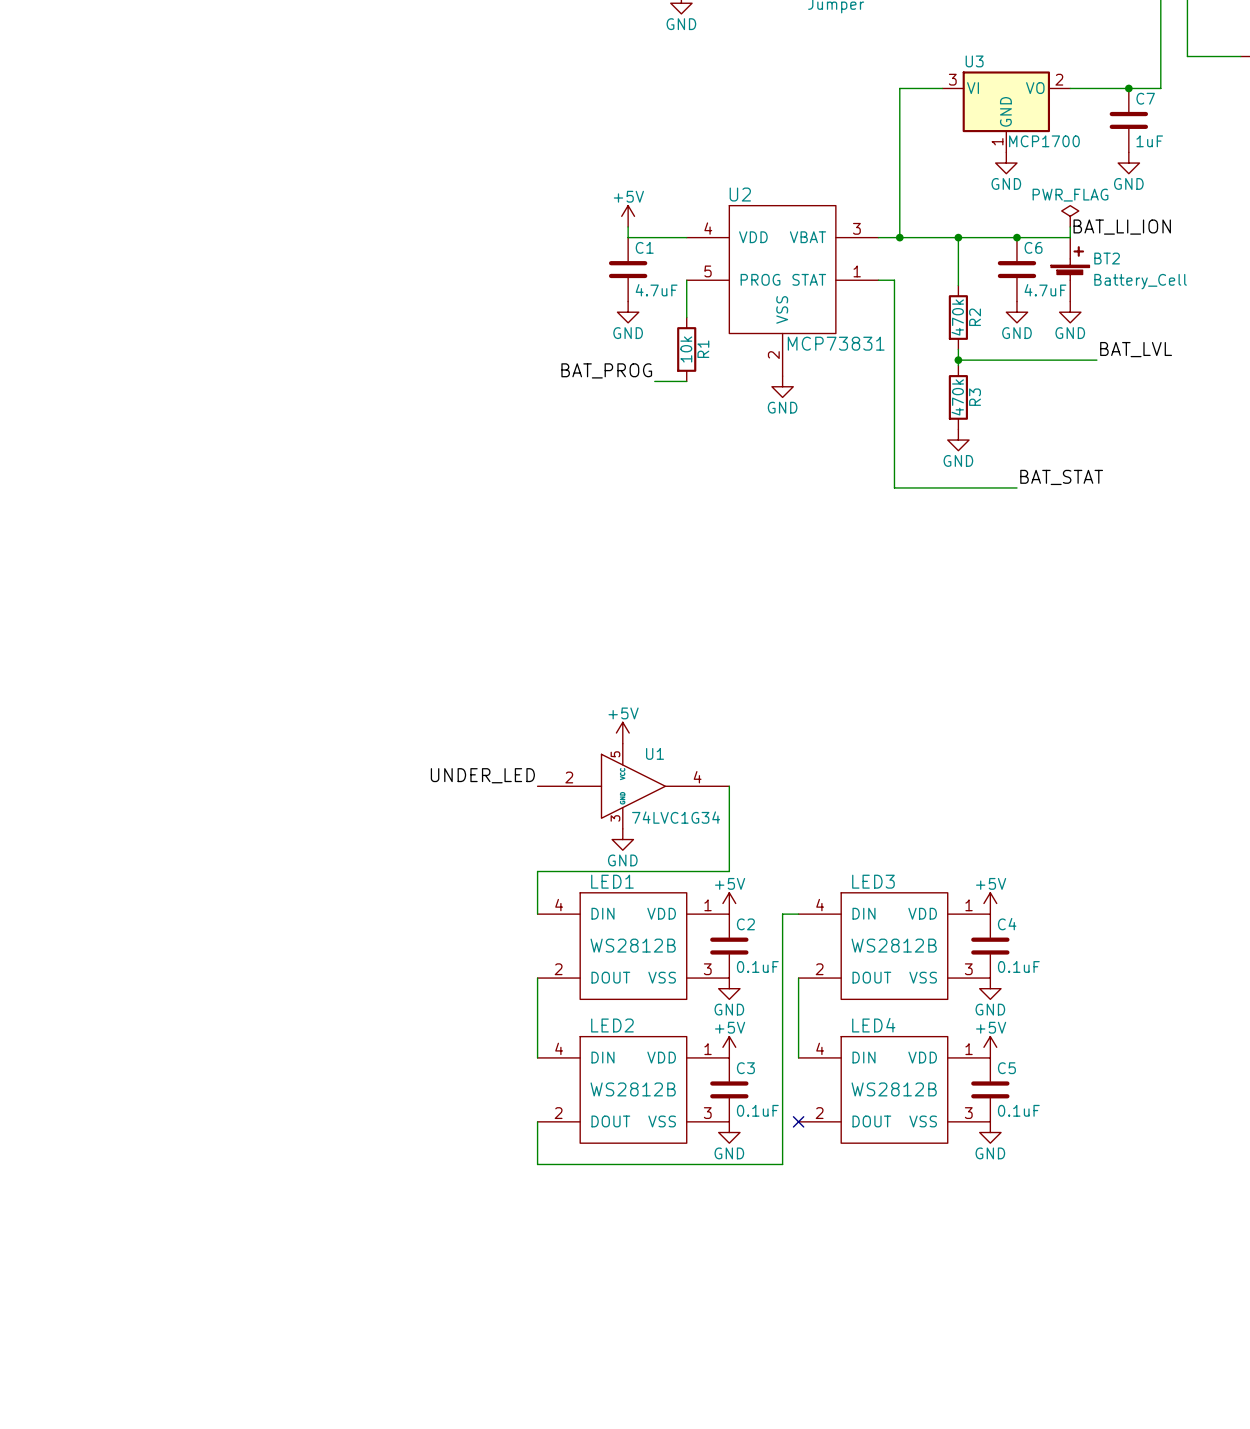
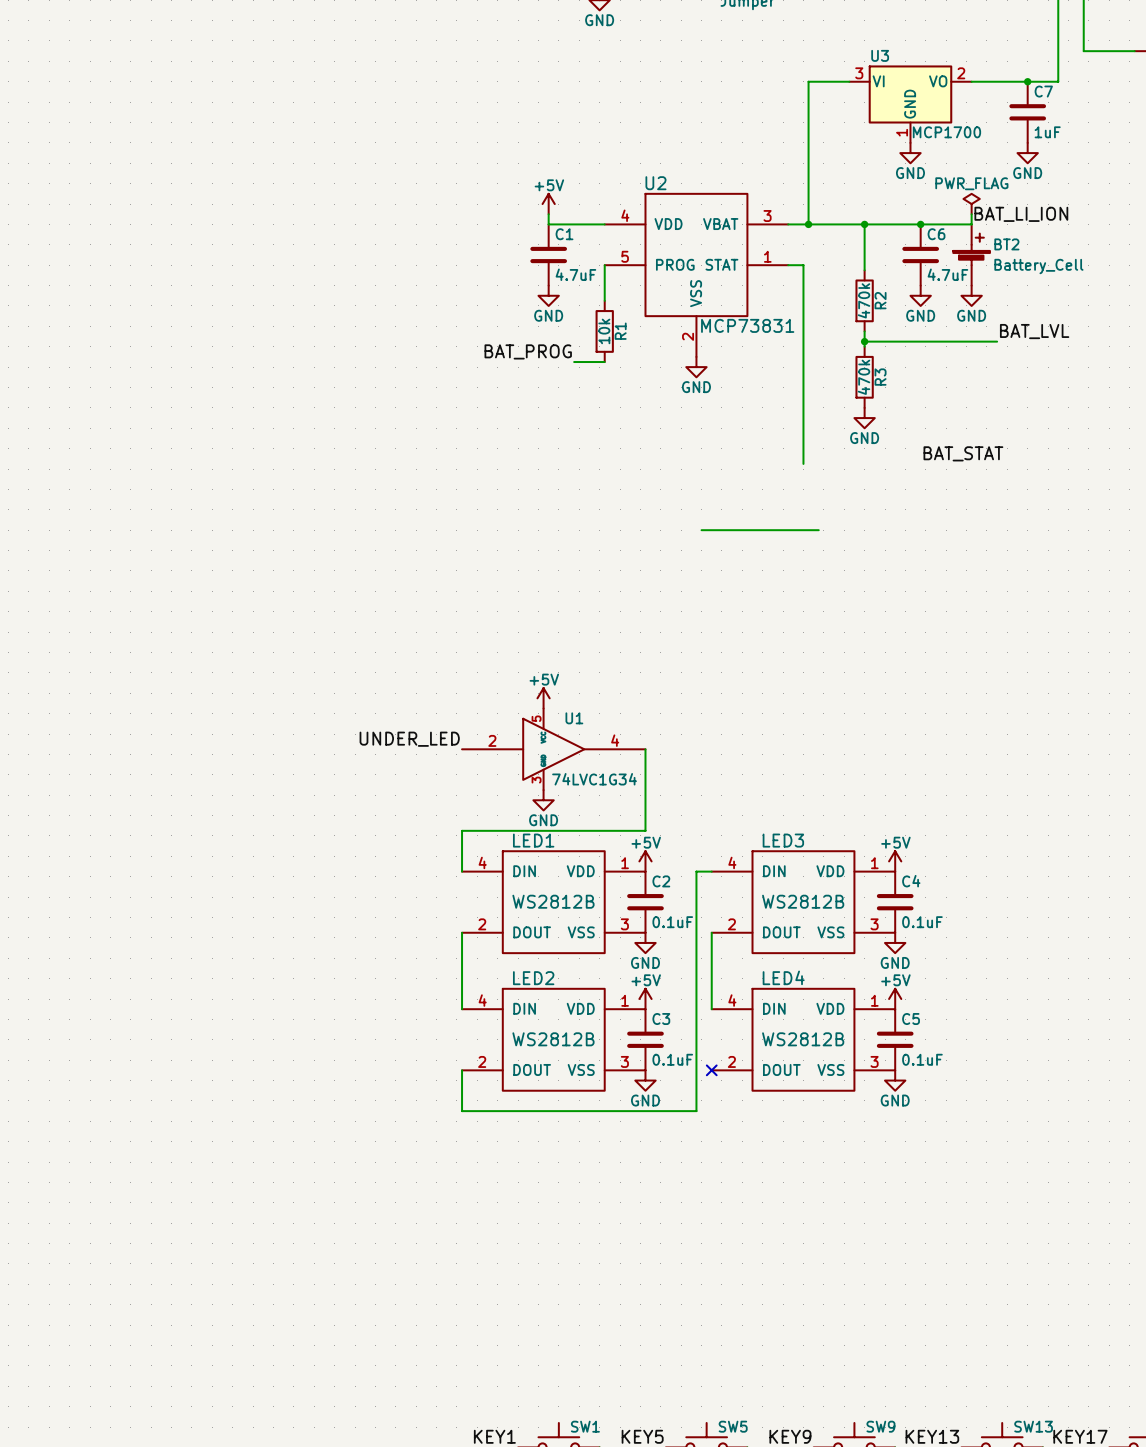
wire: (894, 487) (1016, 487) -> (701, 530) (818, 530)

